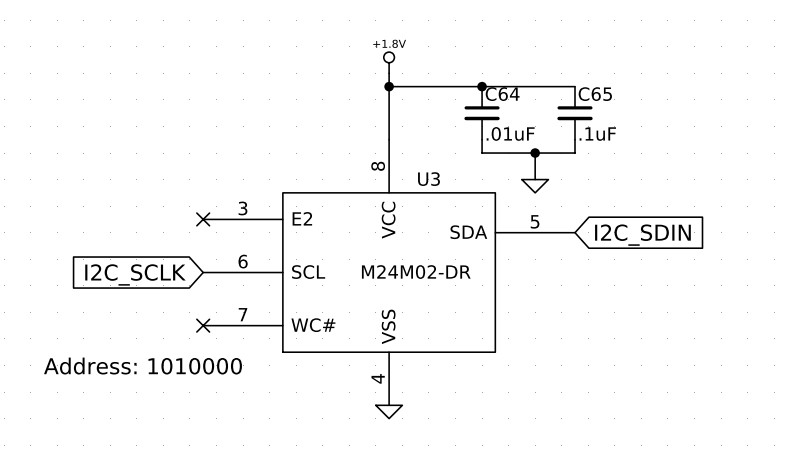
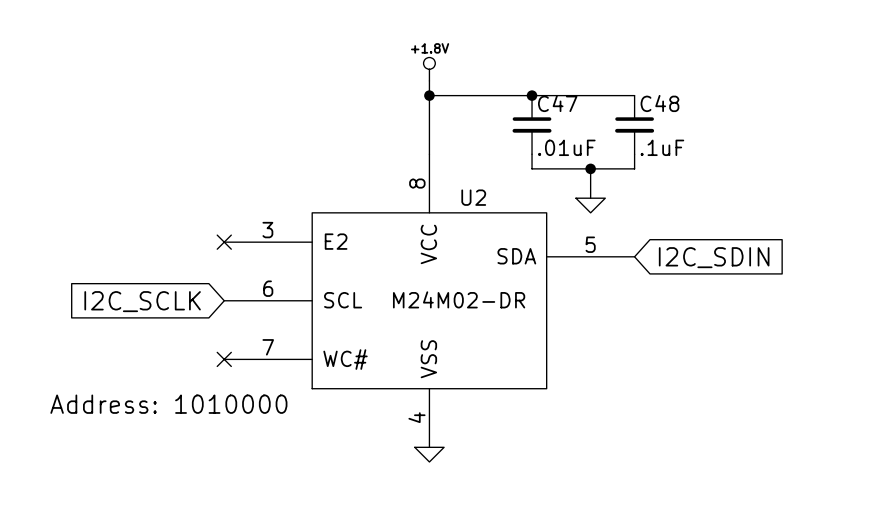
C64 name: C64 (502, 94) -> C47 (557, 103)
C65 name: C65 (595, 94) -> C48 (659, 103)
U3 name: U3 (429, 179) -> U2 (473, 197)

